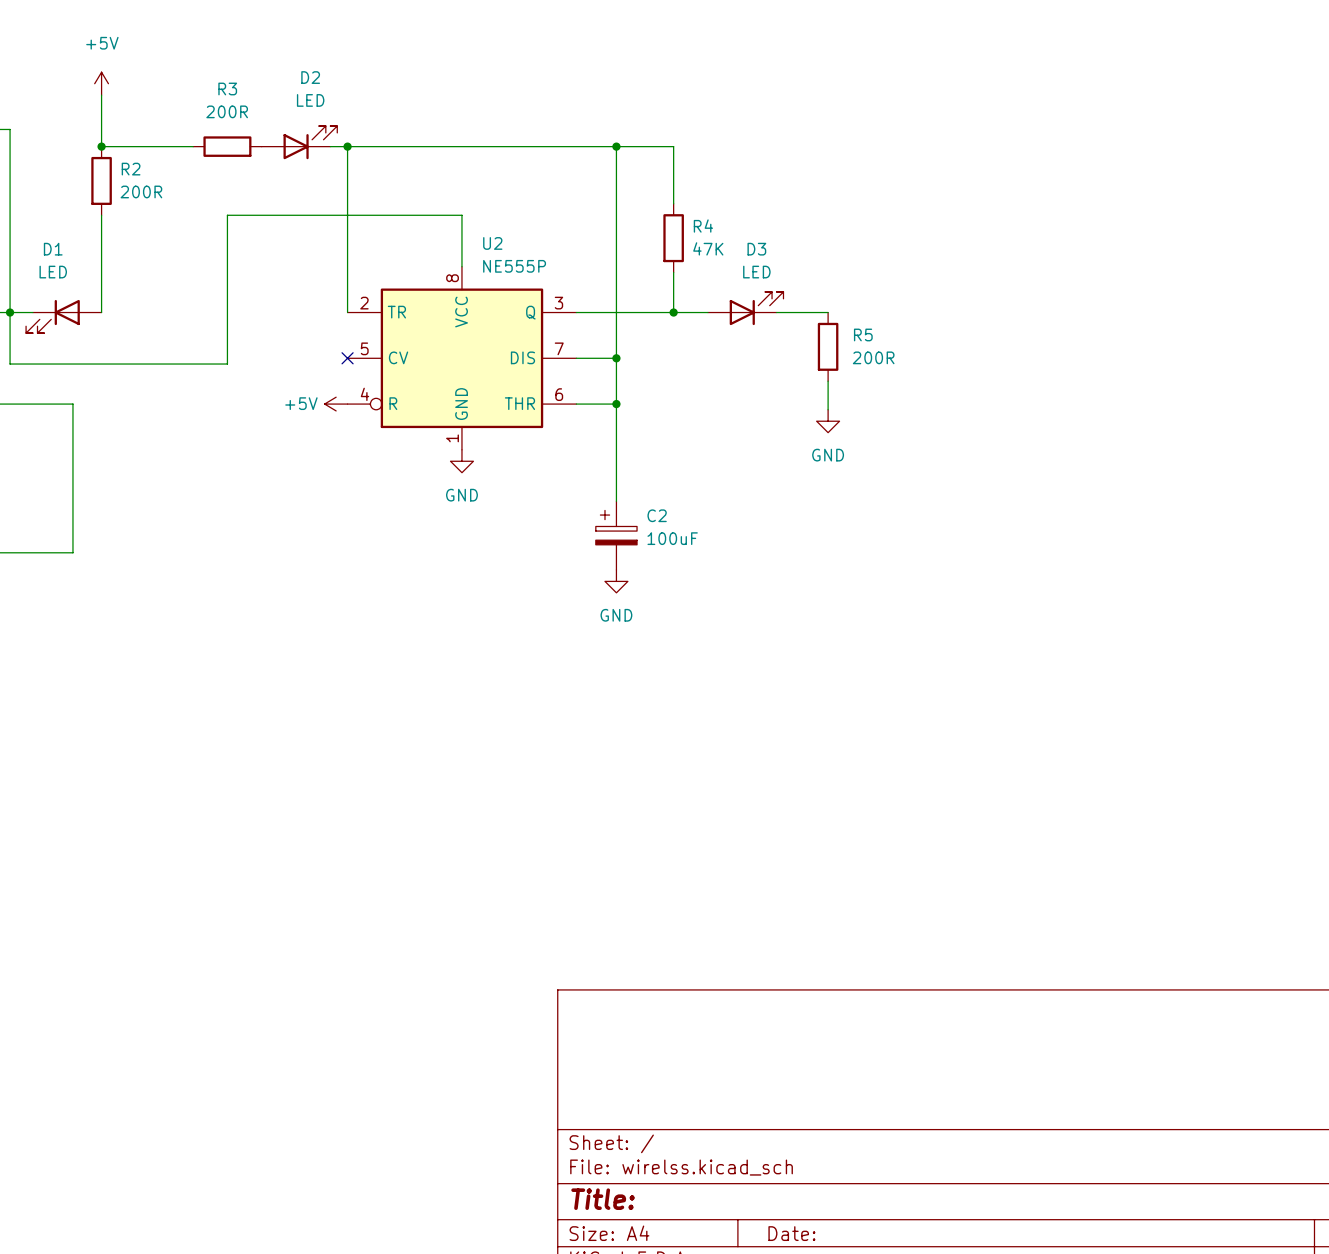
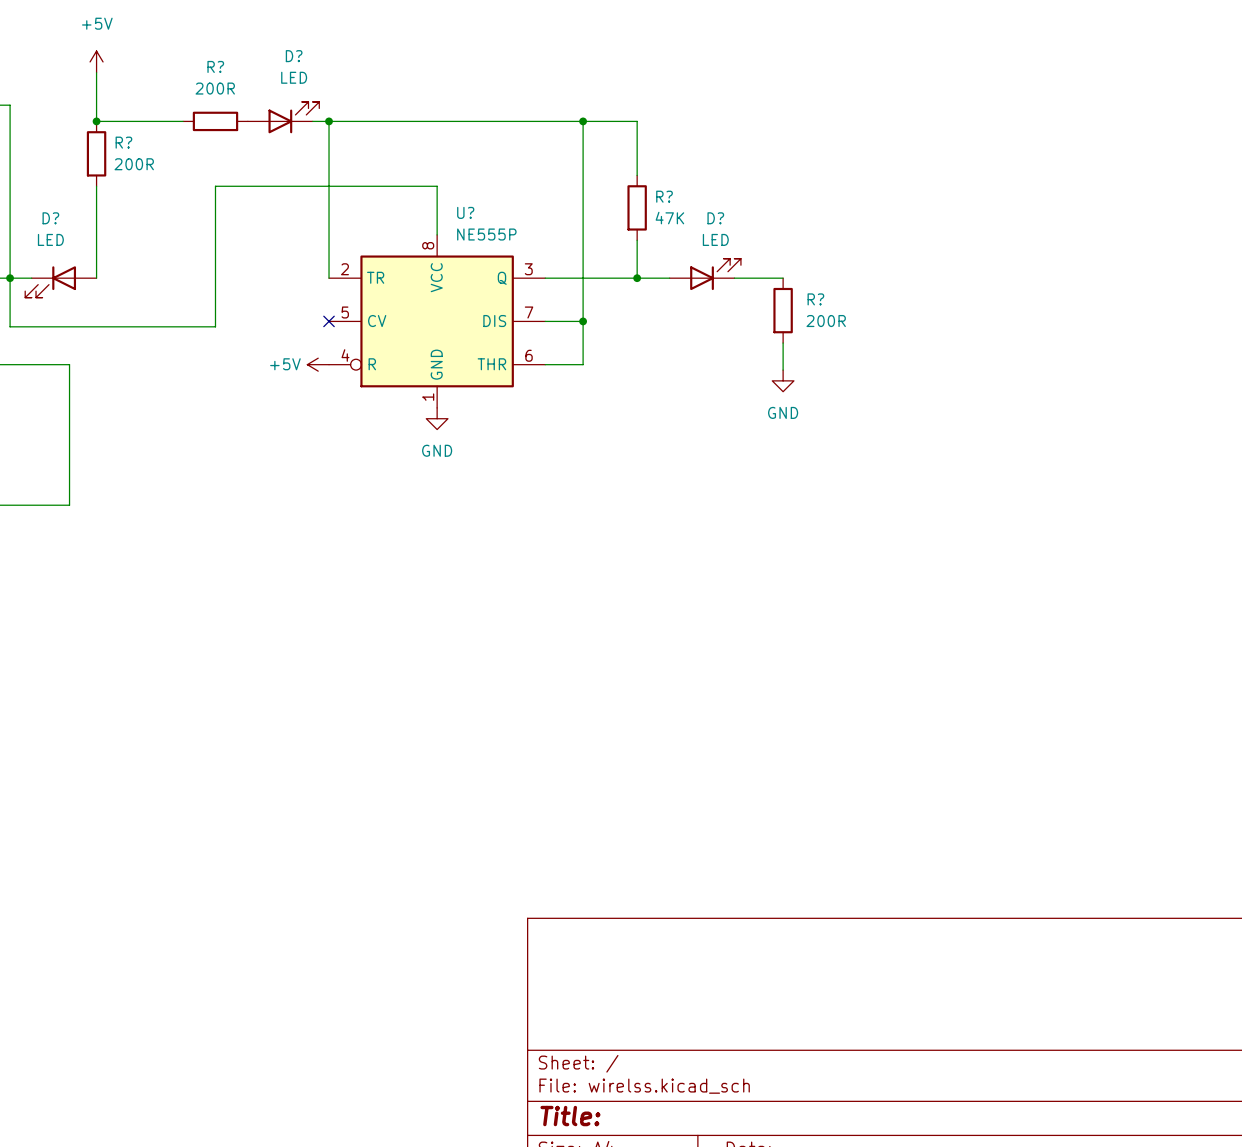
D2 name: D2 (310, 77) -> D? (294, 56)
R3 name: R3 (227, 89) -> R? (215, 66)
R2 name: R2 (131, 169) -> R? (123, 142)
R4 name: R4 (703, 226) -> R? (664, 196)
U2 name: U2 (492, 243) -> U? (465, 212)
D1 name: D1 (53, 249) -> D? (50, 218)
D3 name: D3 (756, 249) -> D? (715, 218)
R5 name: R5 (863, 334) -> R? (815, 299)
wire: (616, 404) (616, 501) -> none
junction: (616, 404) -> none
C2: 100uF (616, 535) -> none
power symbol: GND (616, 581) -> none

